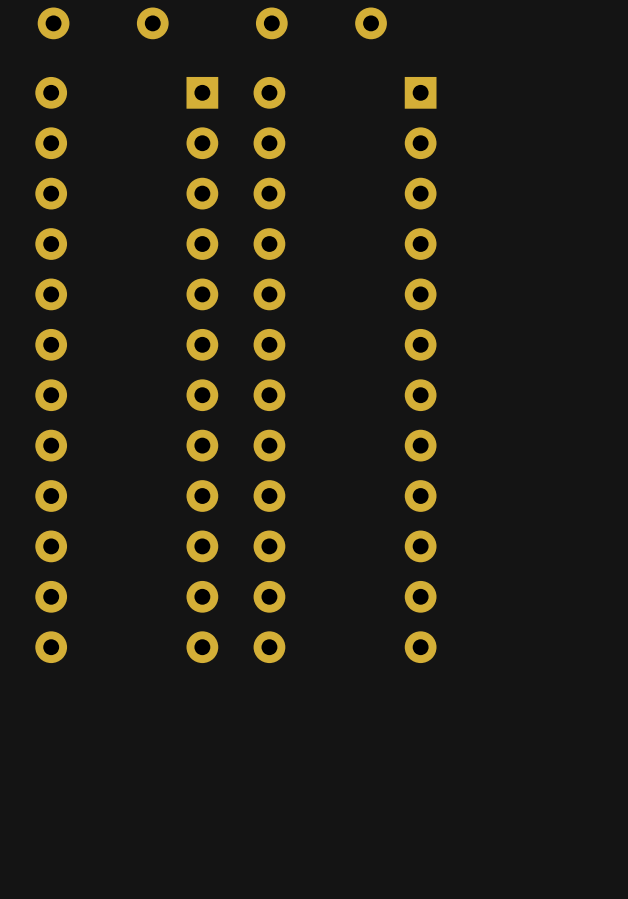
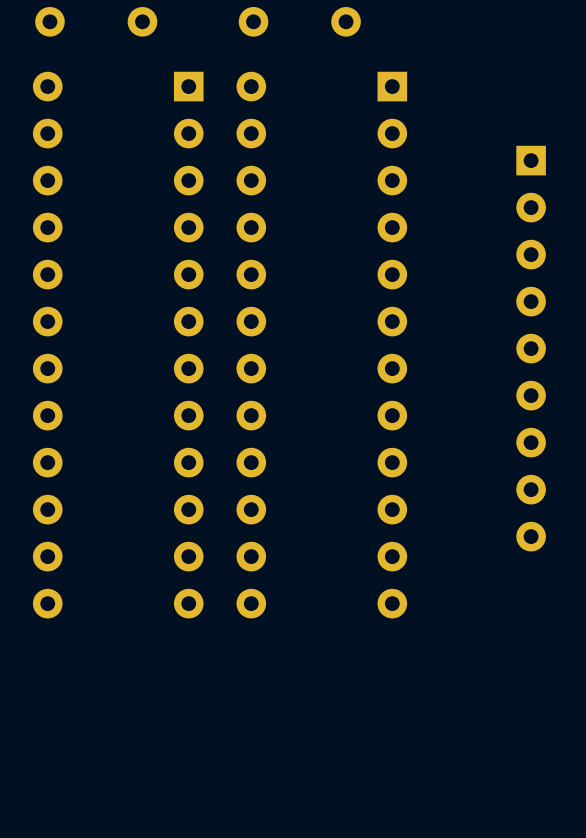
part: none -> (531, 348)

